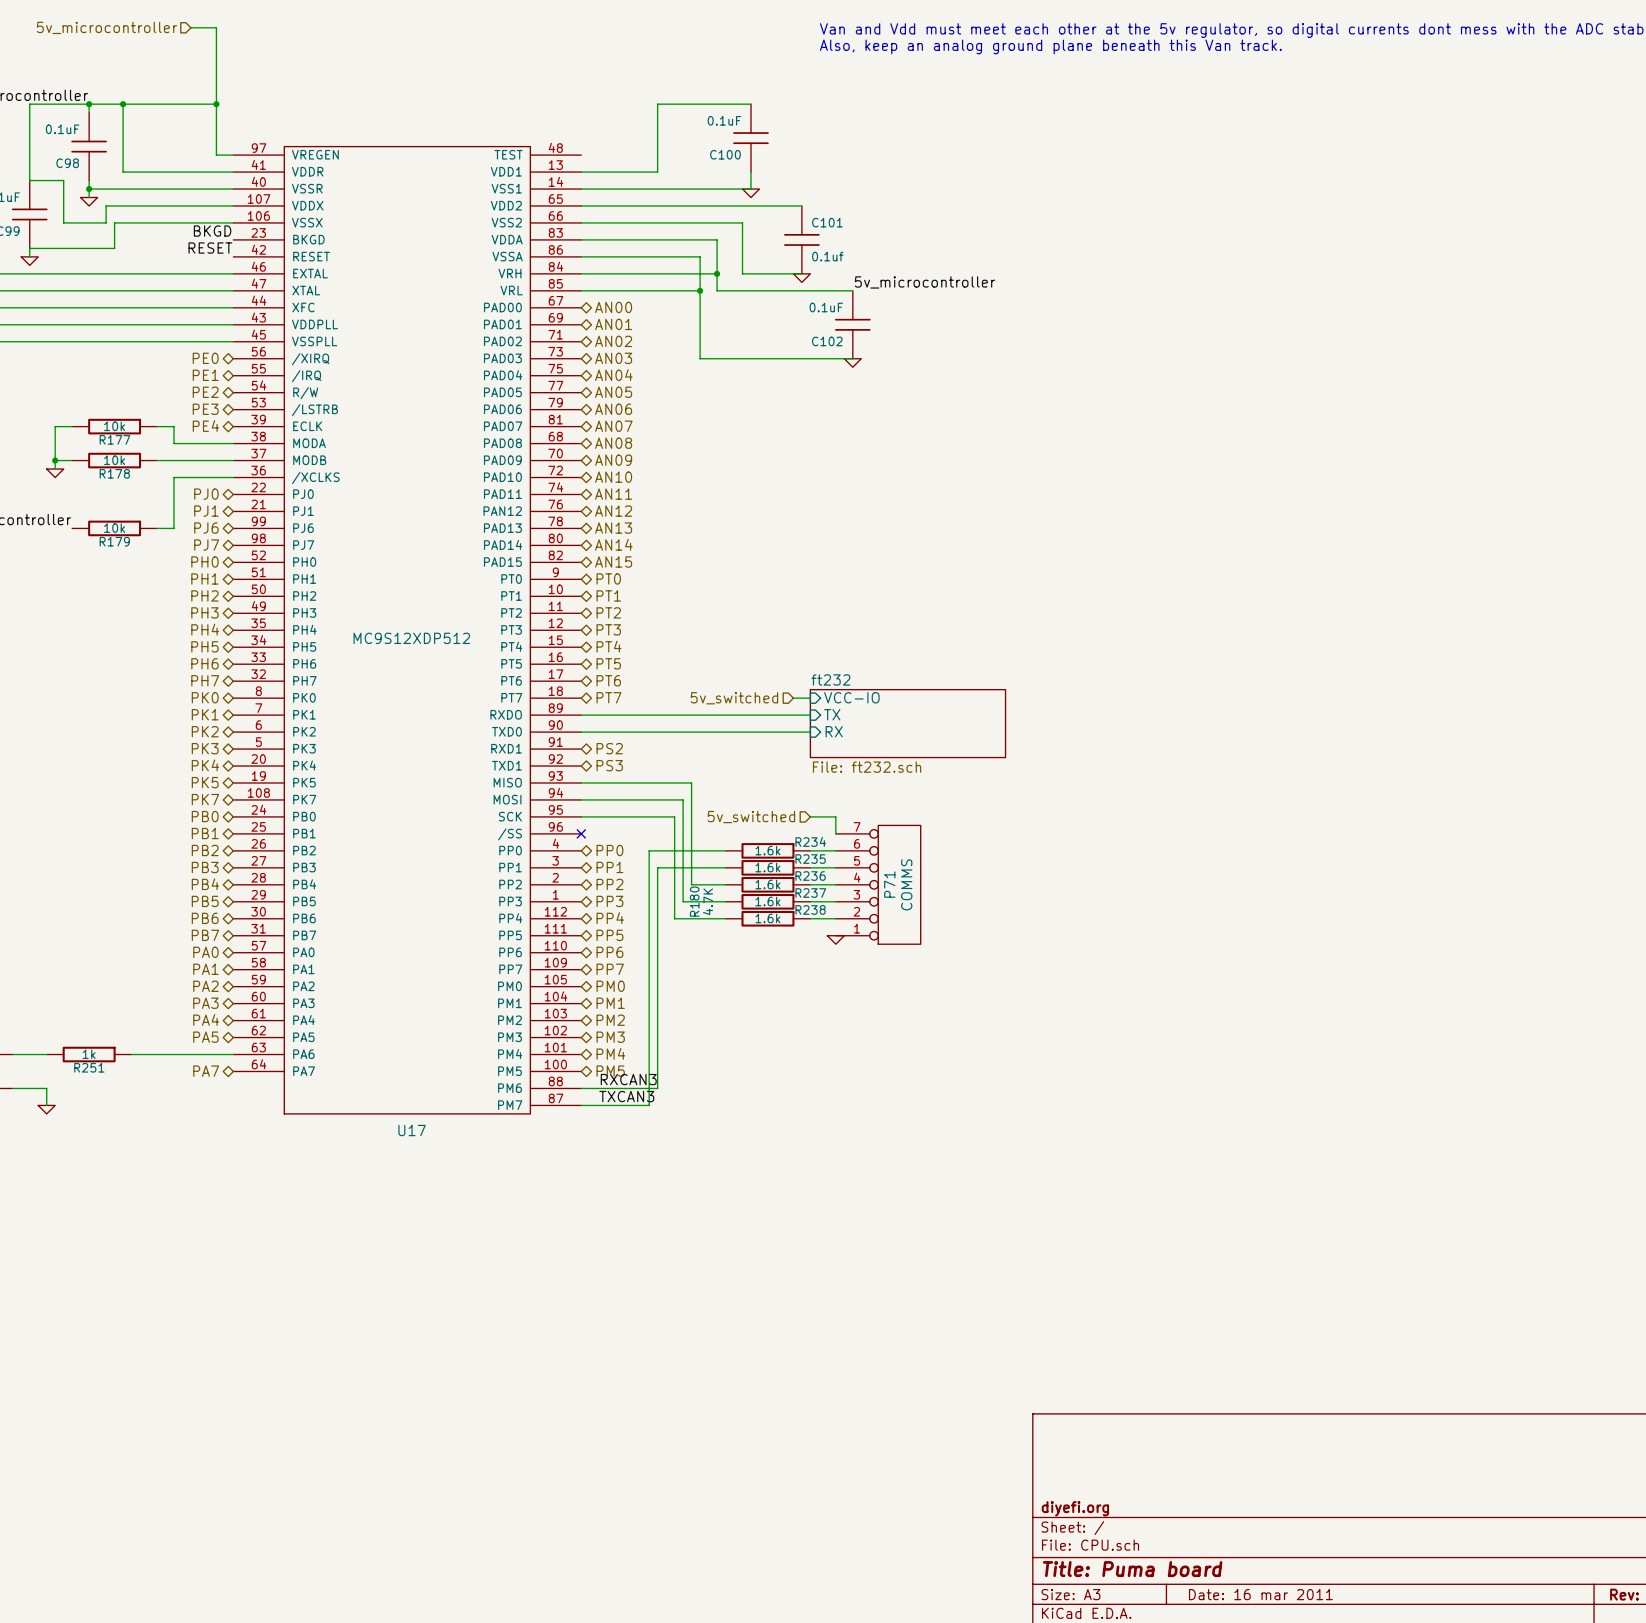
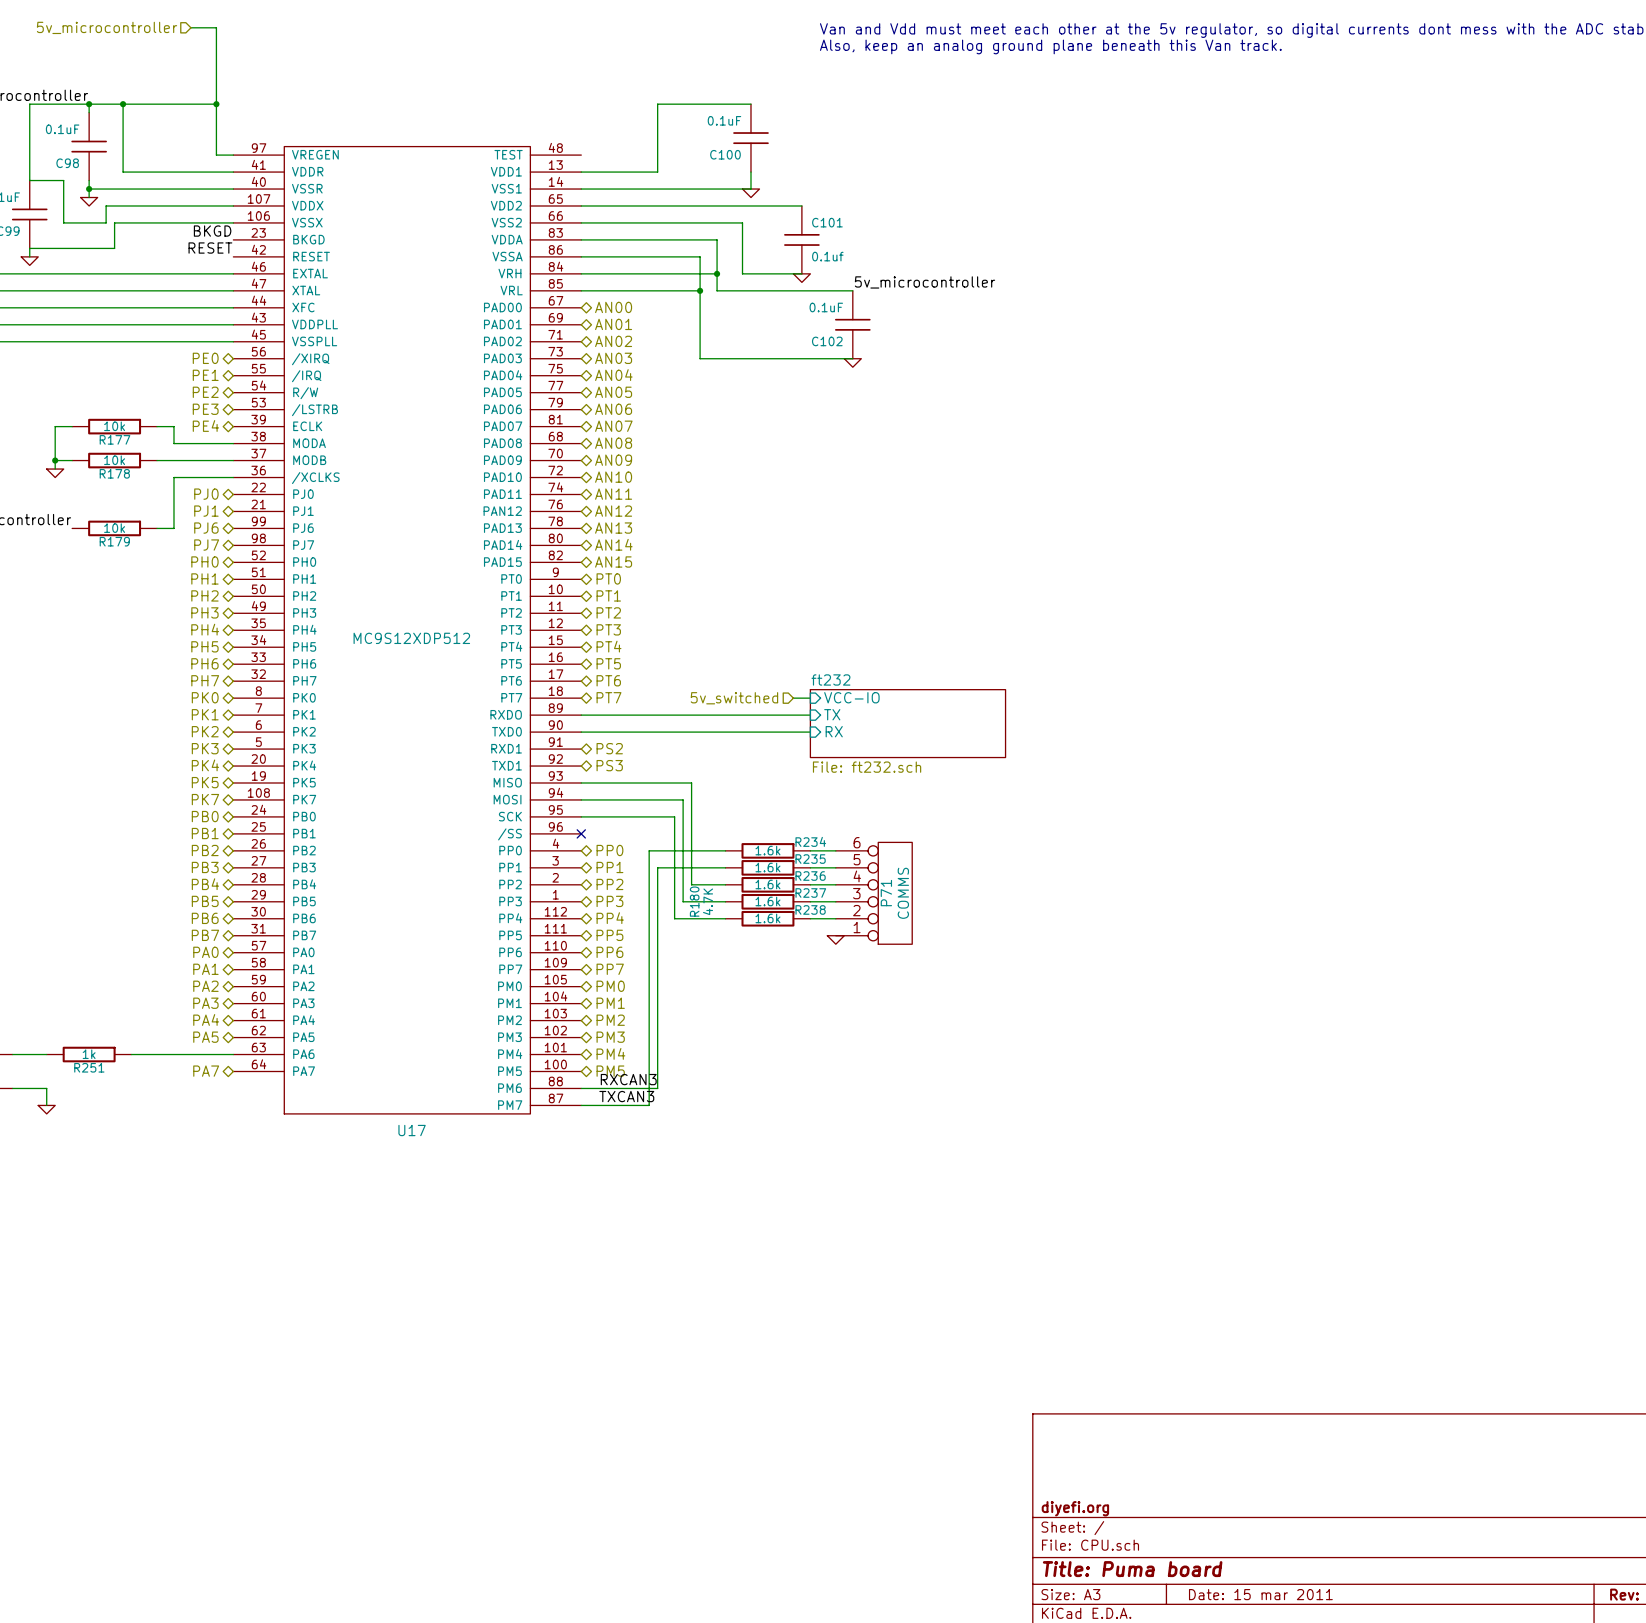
wire: (810, 816) (835, 816) (835, 833) -> none
hierarchical label: 5v_switched (751, 817) -> none
P71 symbol: [835, 825, 921, 945] -> [835, 842, 913, 945]
title block: Date: 16 mar 2011 (1260, 1594) -> Date: 15 mar 2011 (1260, 1594)

